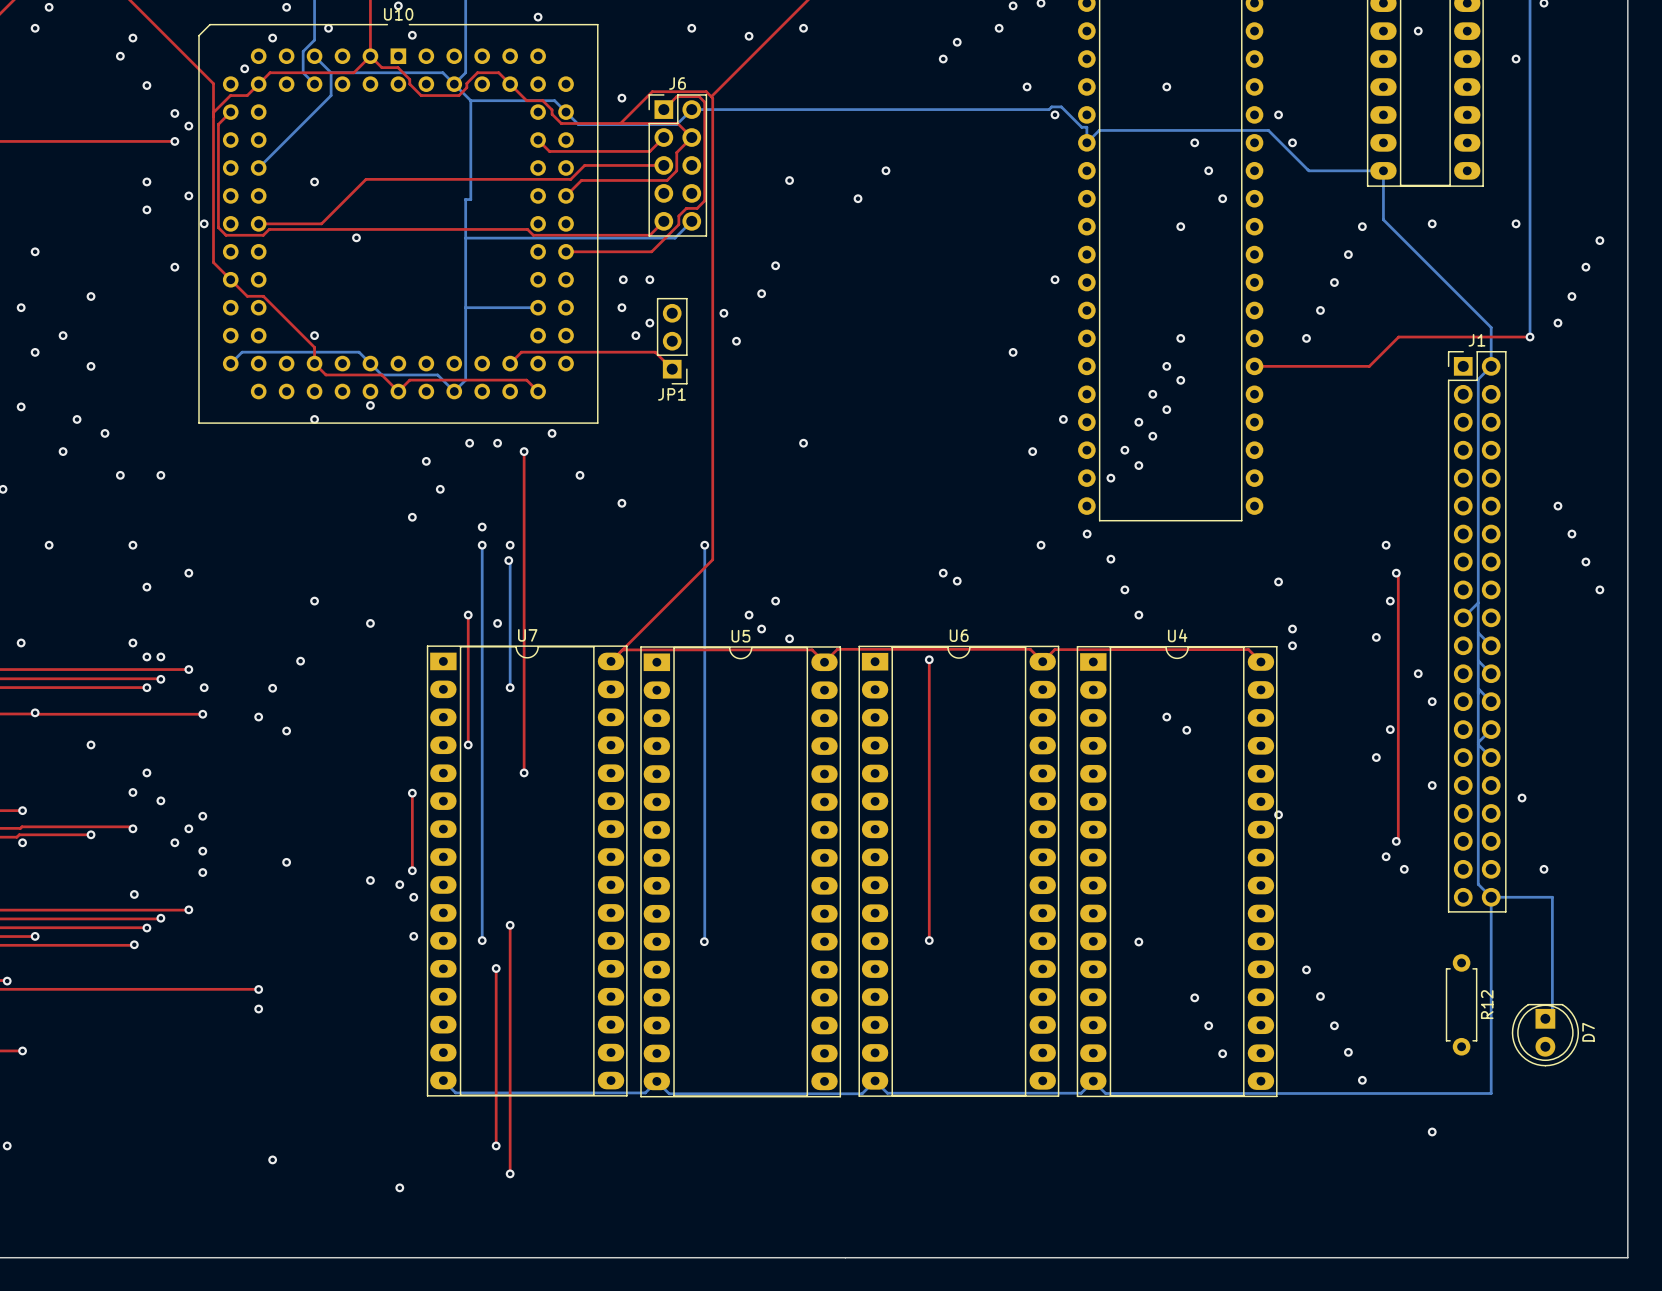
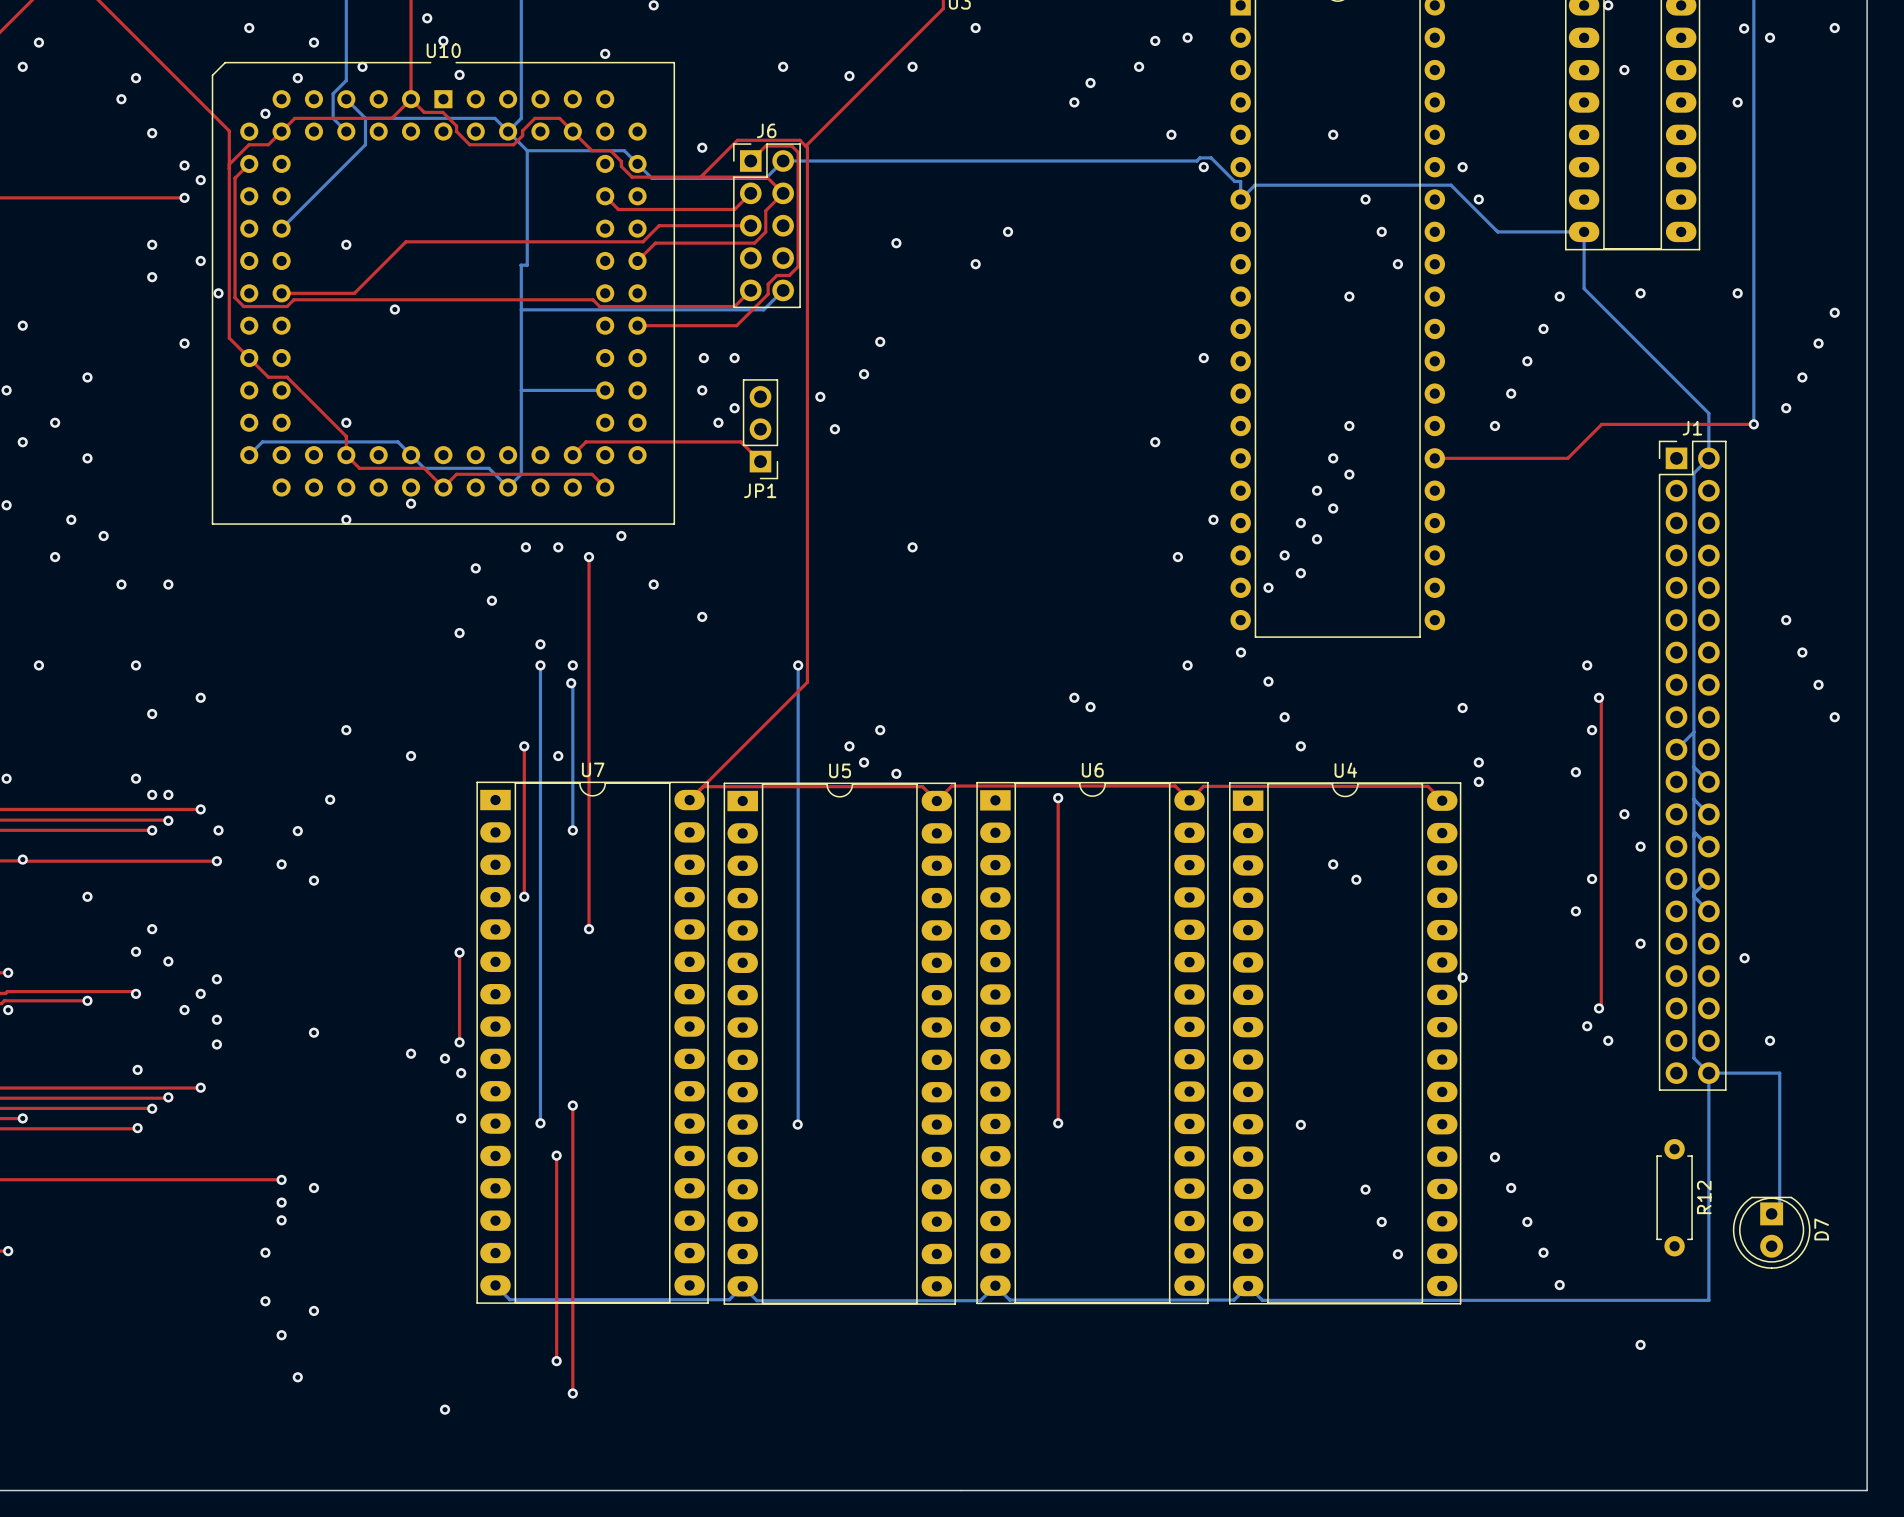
via: none -> (313, 1188)
via: none -> (281, 1220)
via: none -> (265, 1252)
via: none -> (265, 1301)
via: none -> (313, 1310)
via: none -> (281, 1335)

